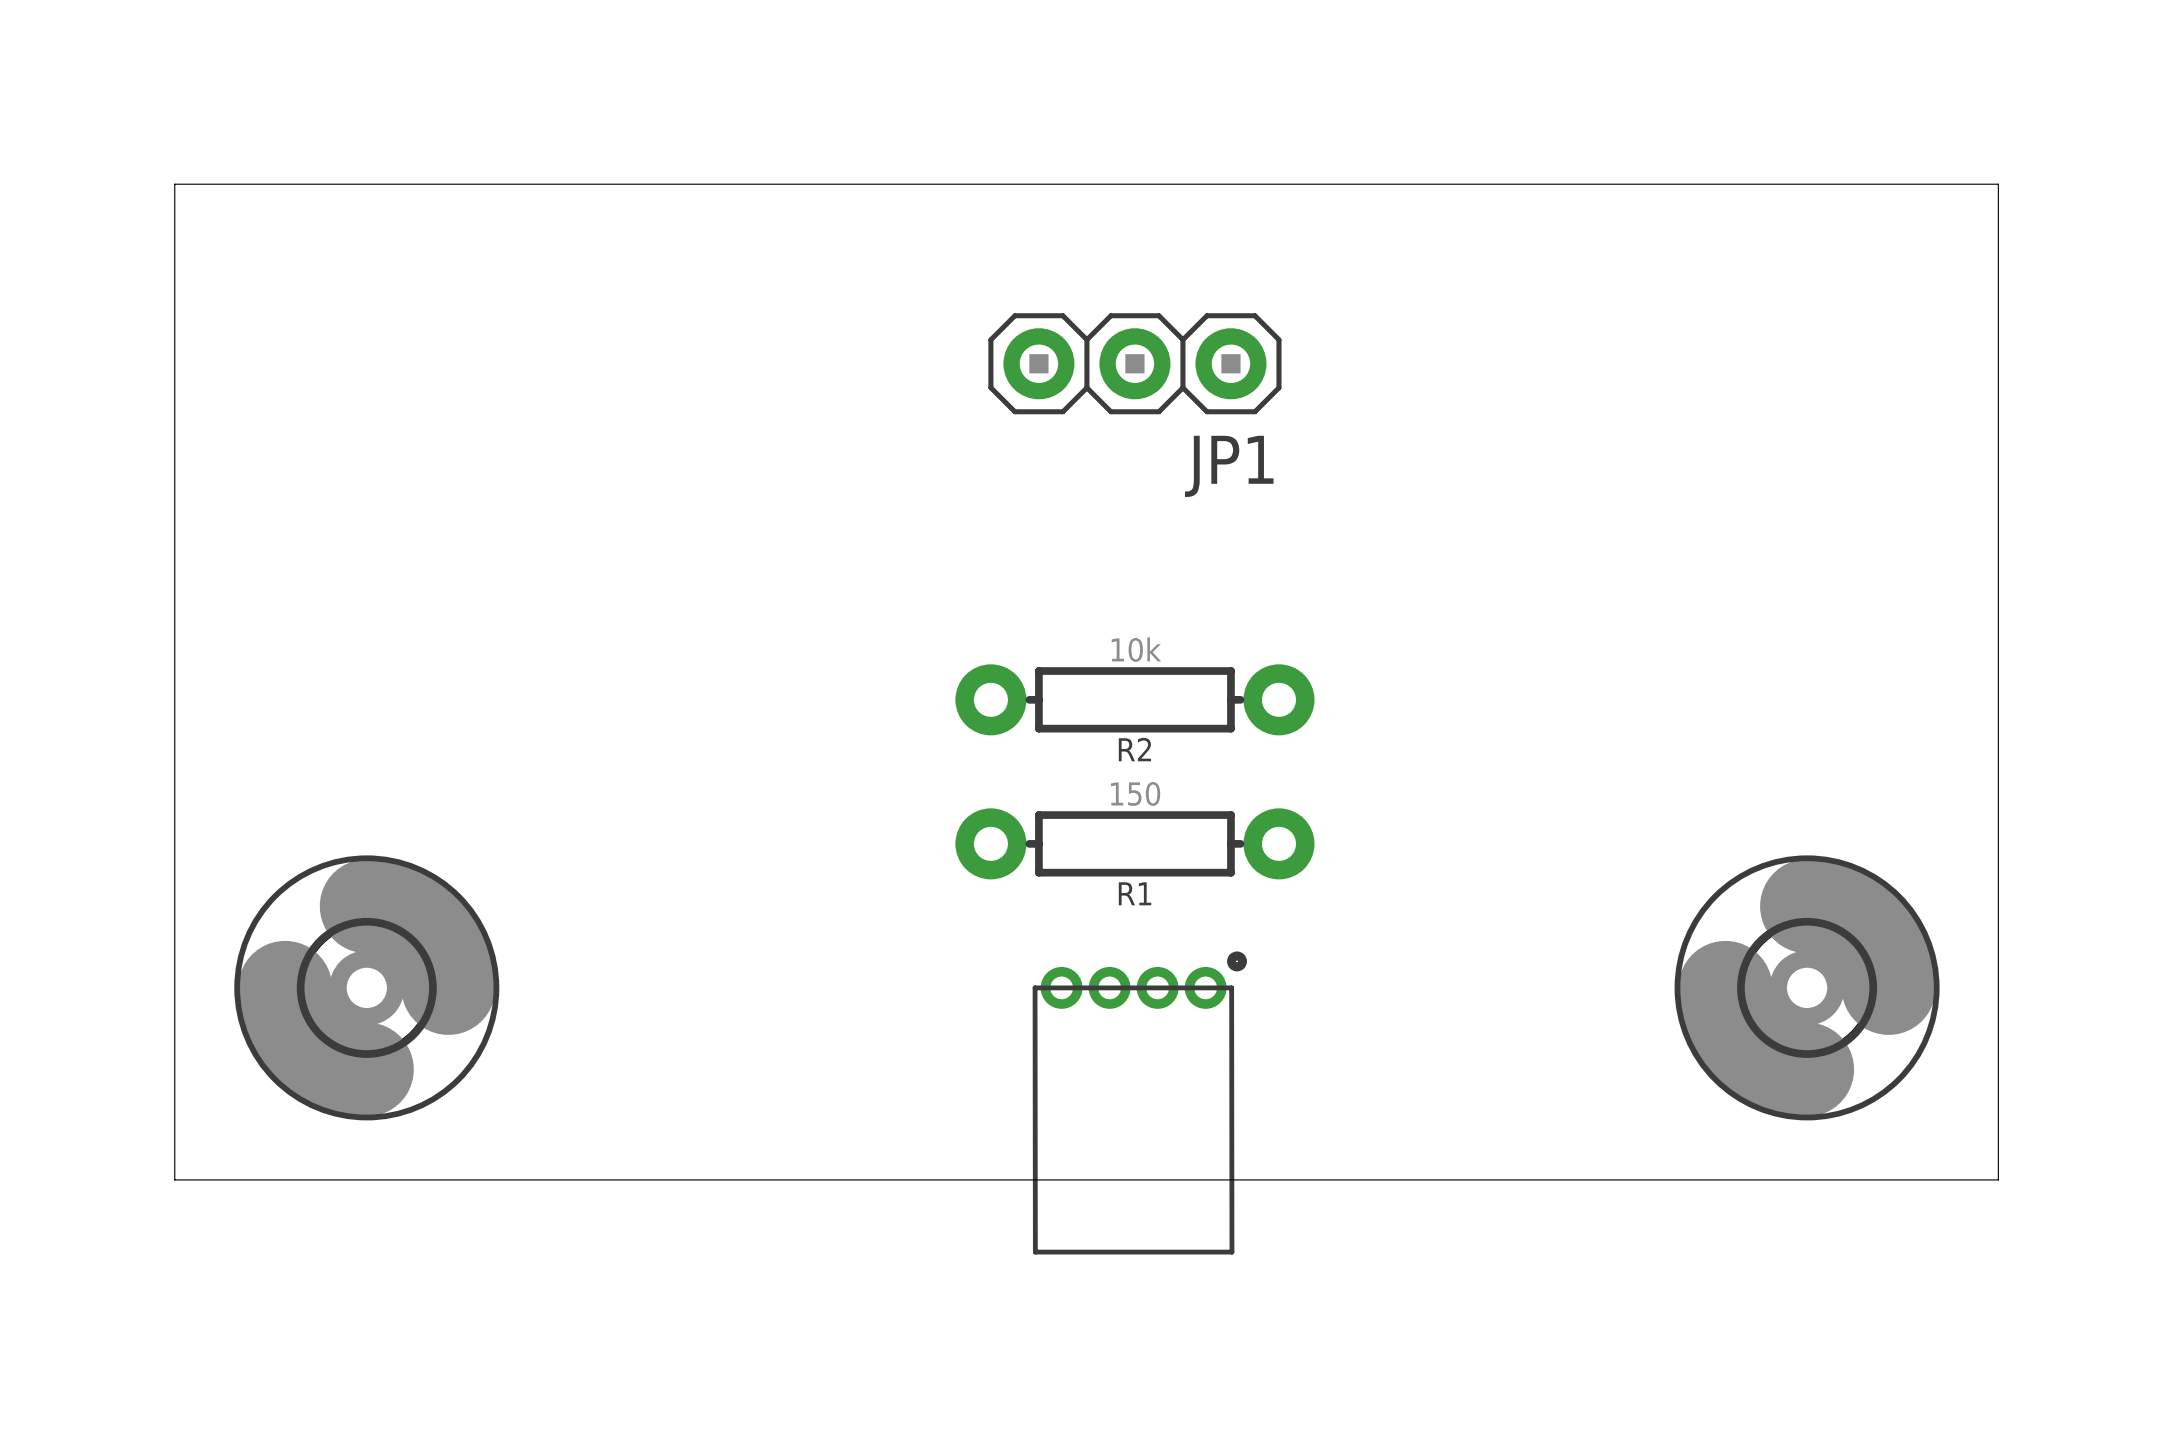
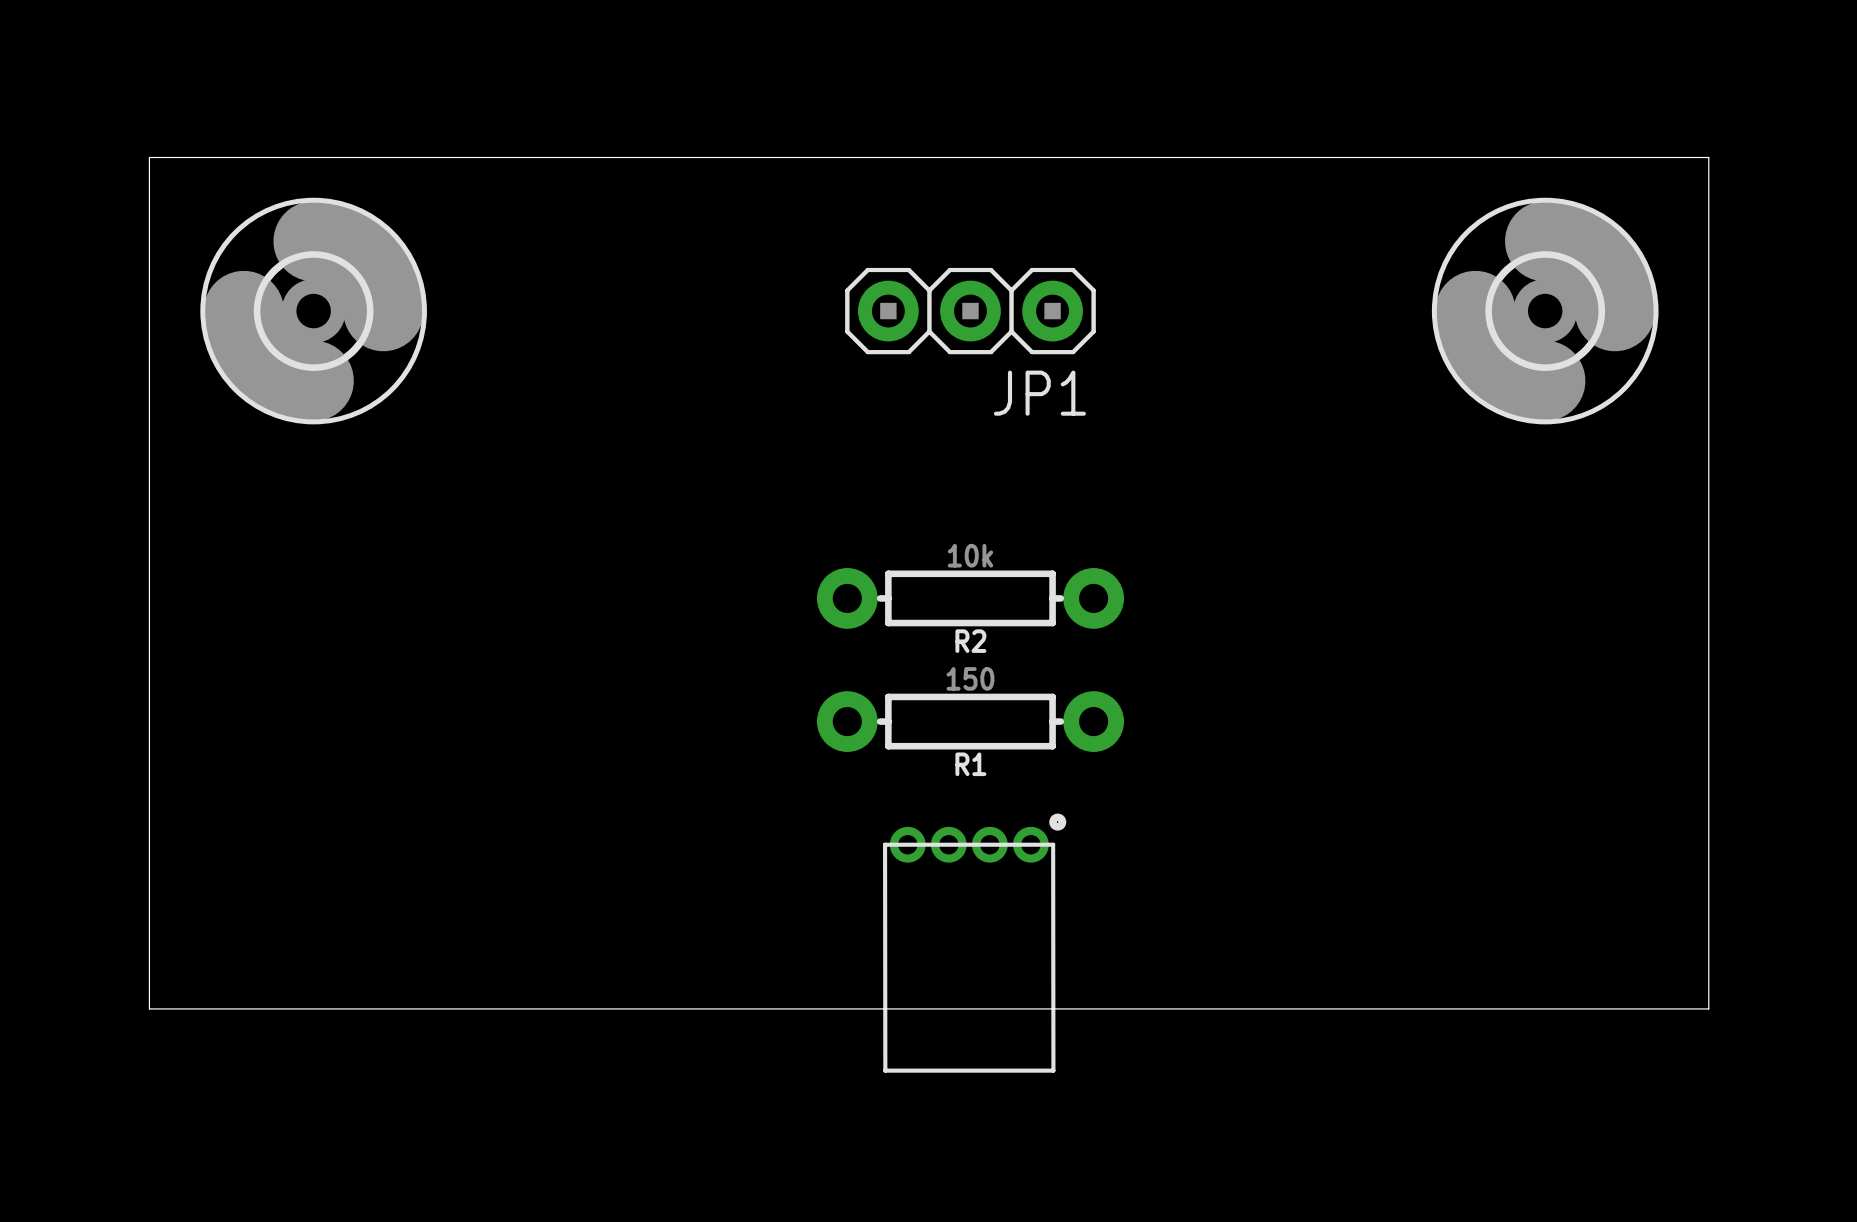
part position: (366, 987) -> (313, 311)
part position: (1807, 987) -> (1545, 311)

